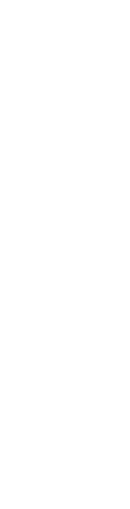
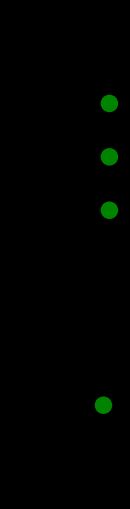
part: none -> (109, 103)
part: none -> (109, 156)
part: none -> (109, 210)
part: none -> (103, 405)

